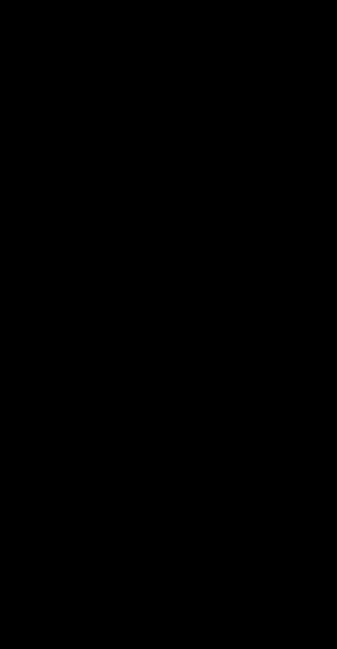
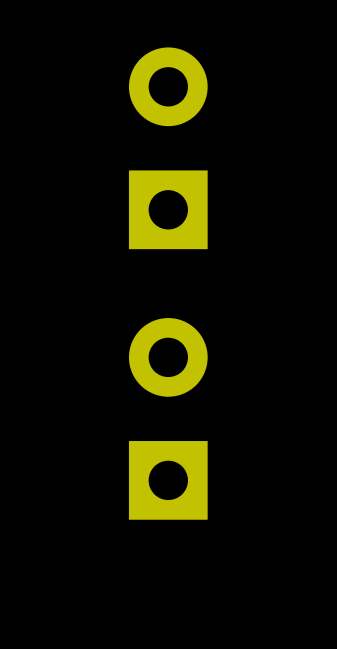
part: none -> (168, 148)
part: none -> (168, 418)

